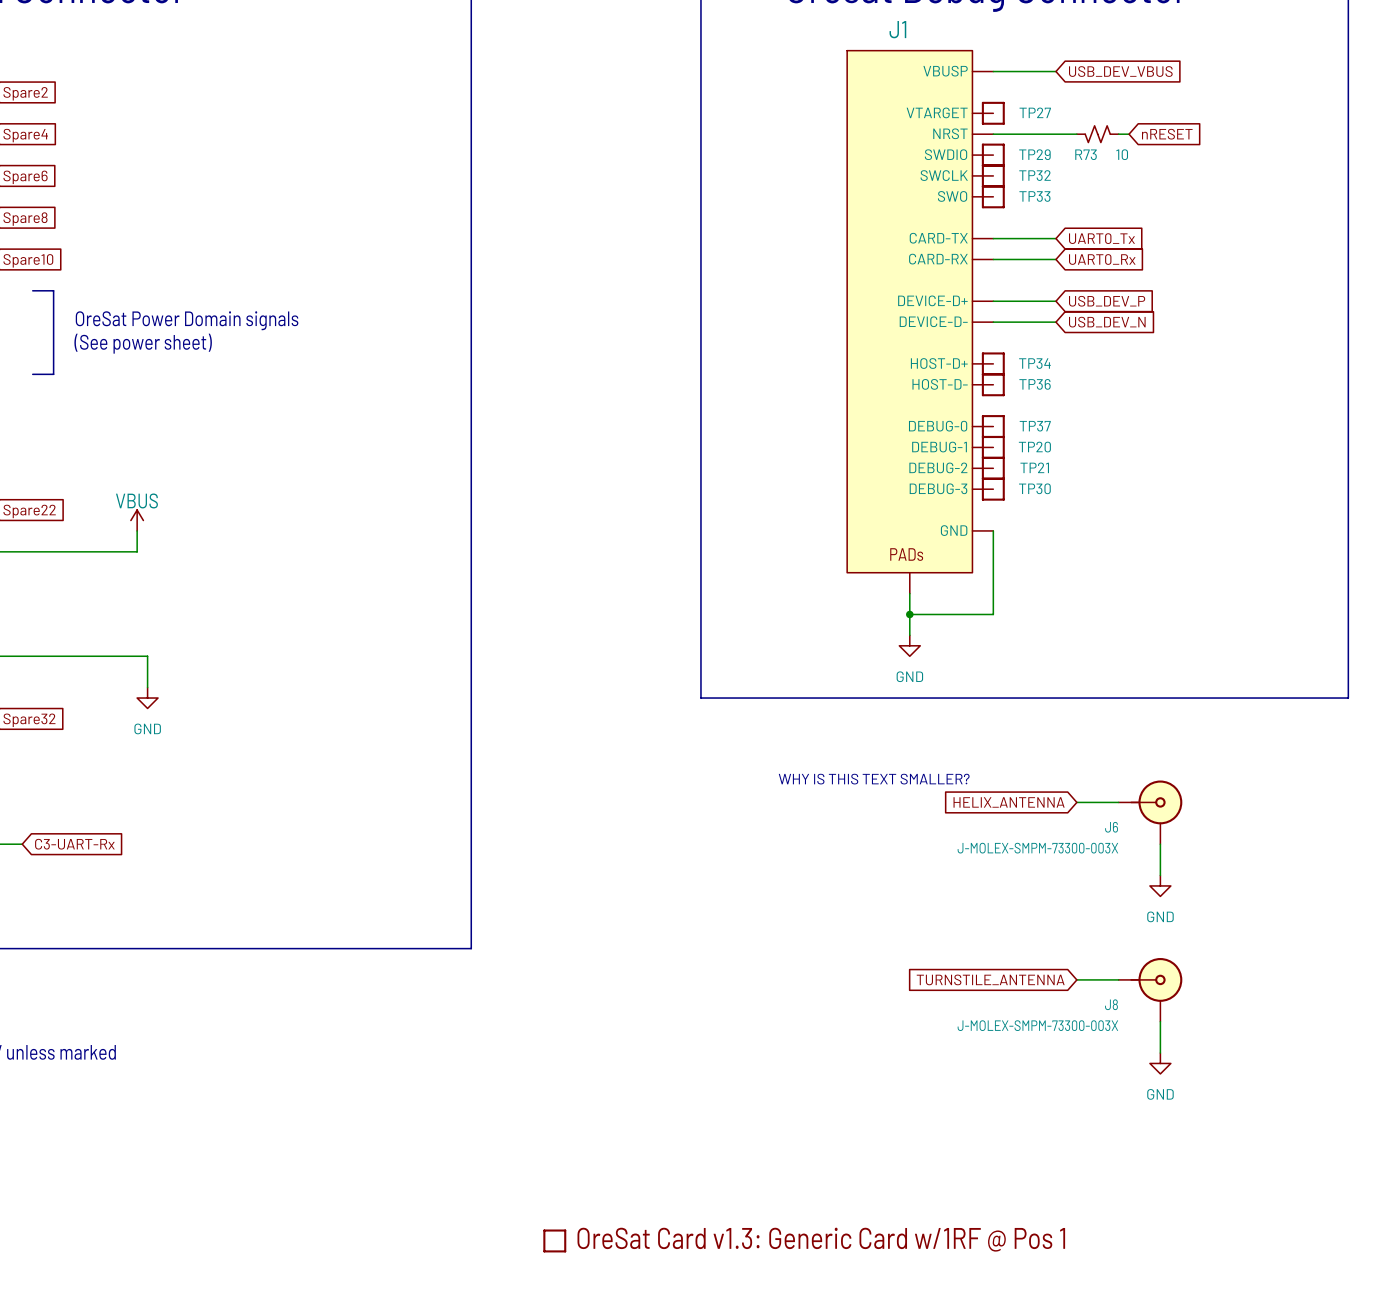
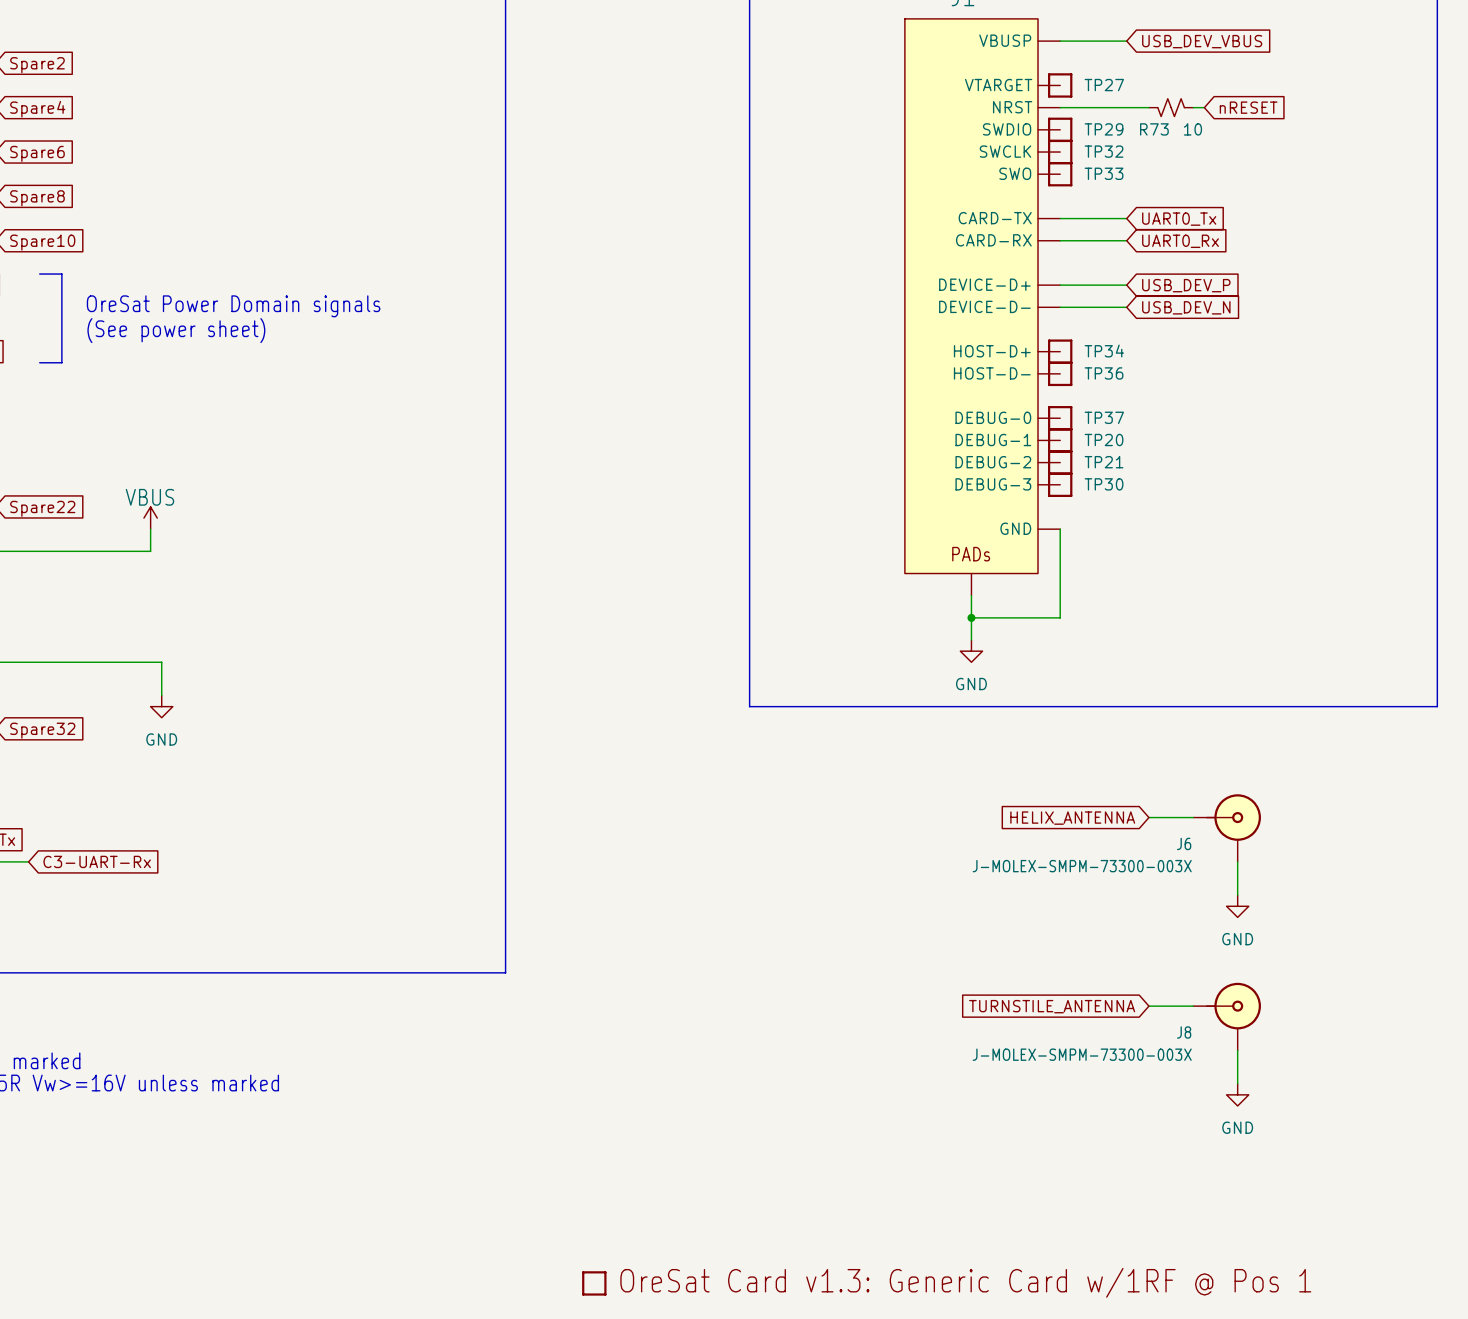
text: WHY IS THIS TEXT SMALLER? (874, 779) -> none

